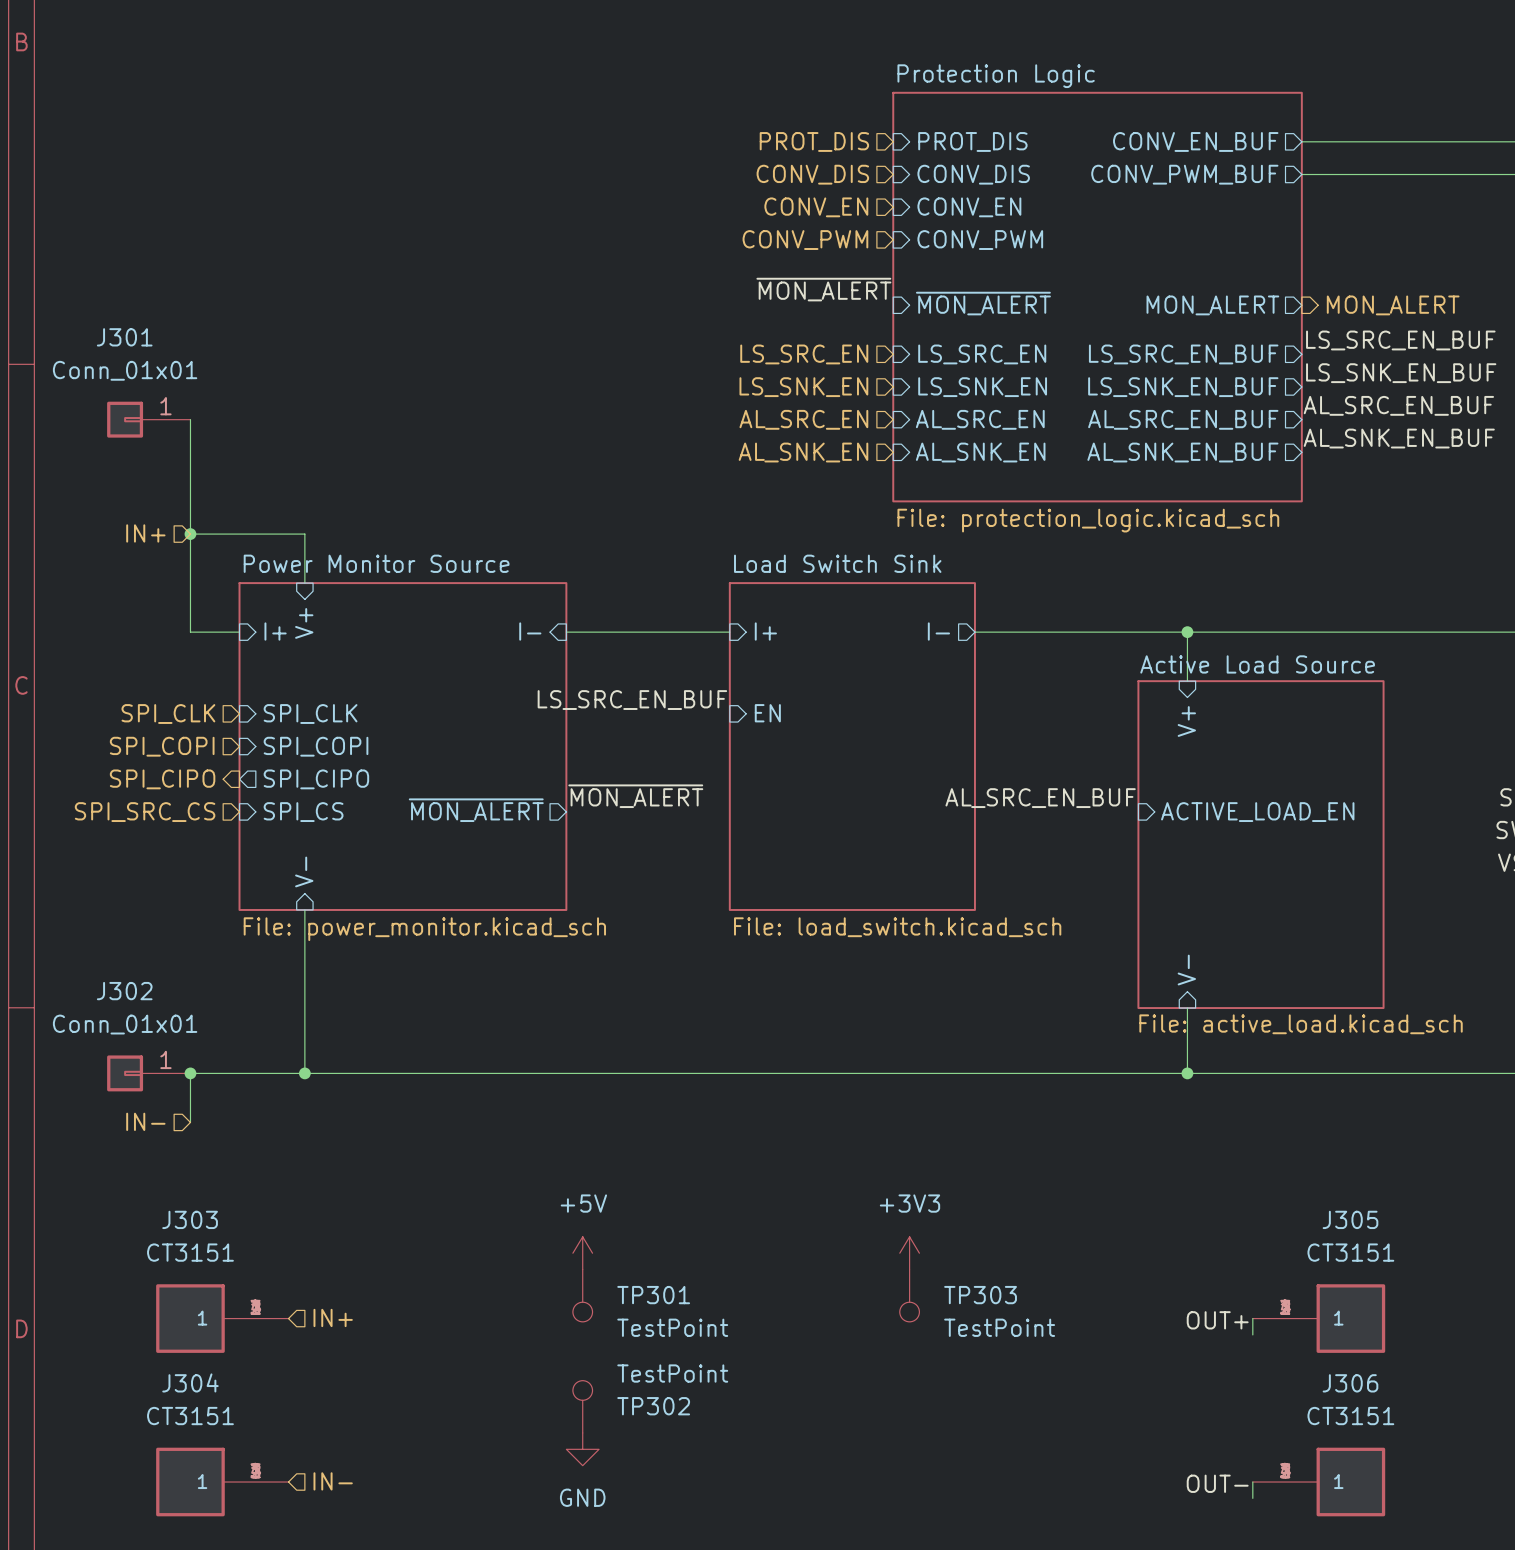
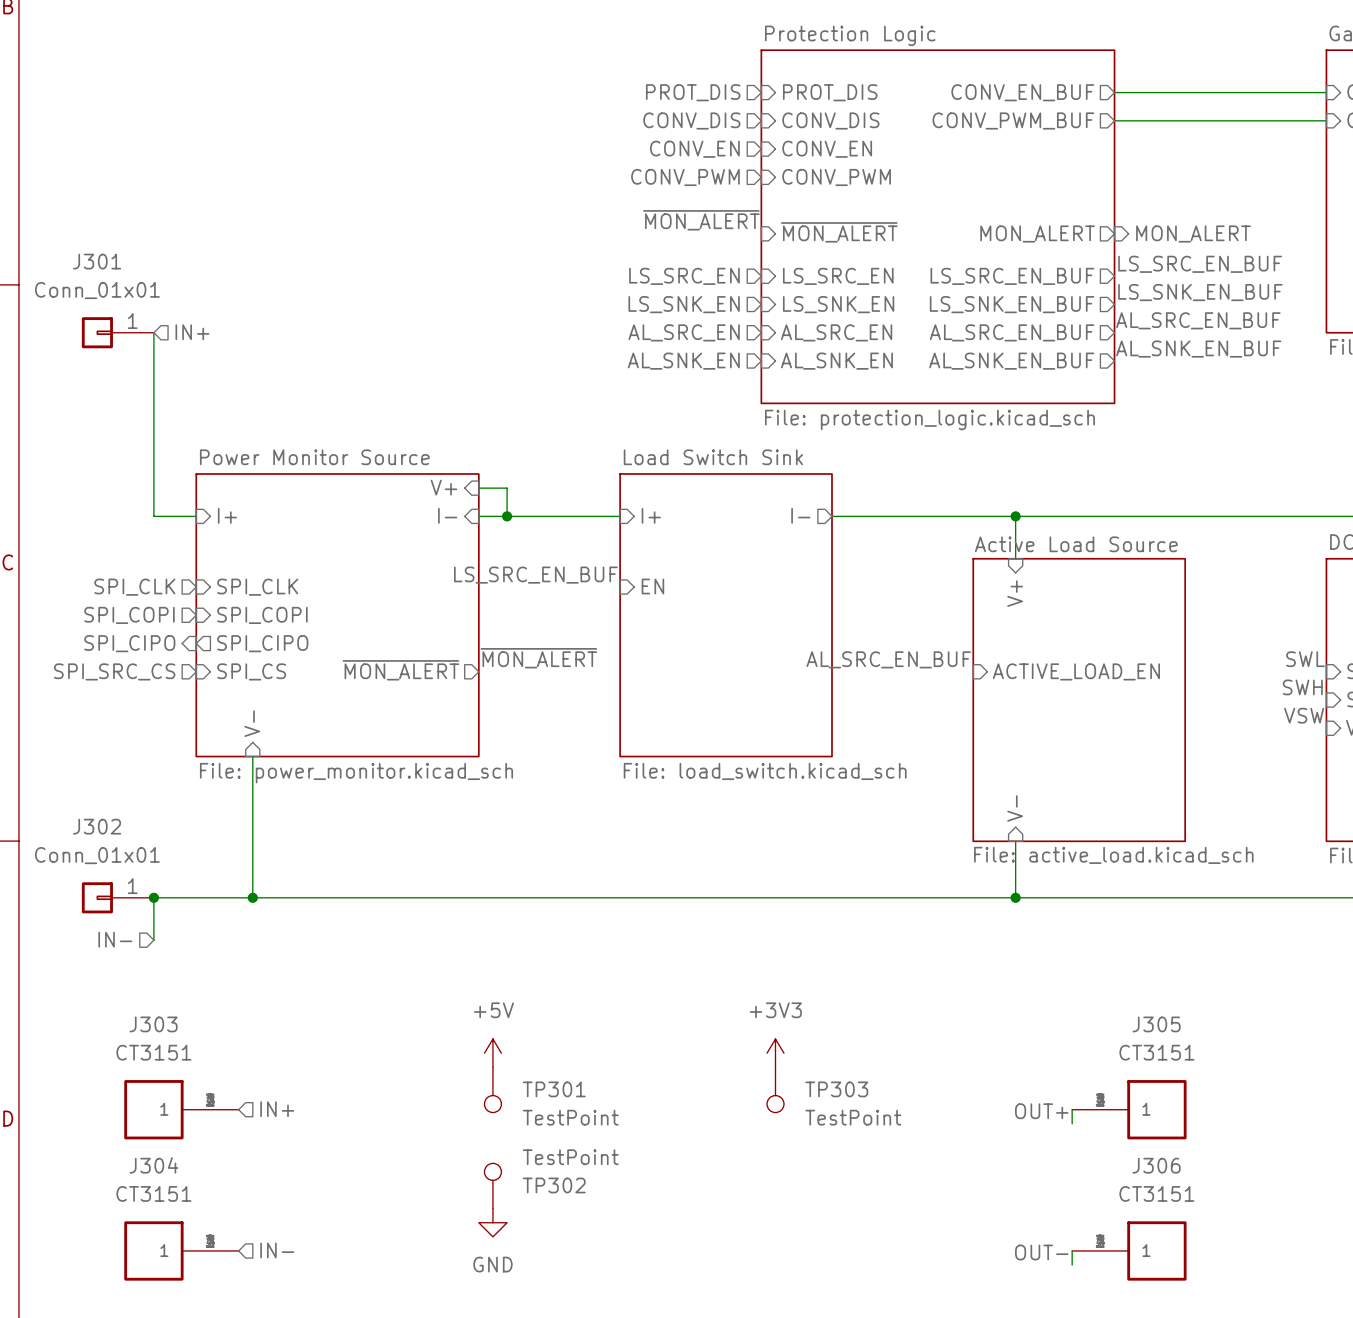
hierarchical label rotation: 0° (145, 533) -> 180° (192, 332)
hierarchical label position: IN+ (145, 533) -> IN+ (192, 332)
wire: (190, 534) (304, 534) (304, 583) -> none
junction: (190, 534) -> none
wire: none -> (478, 488) (507, 488) (507, 516)
sheet pin rotation: 0° (304, 623) -> 90° clockwise (443, 487)
sheet pin position: V+ (304, 623) -> V+ (443, 487)
junction: none -> (507, 516)

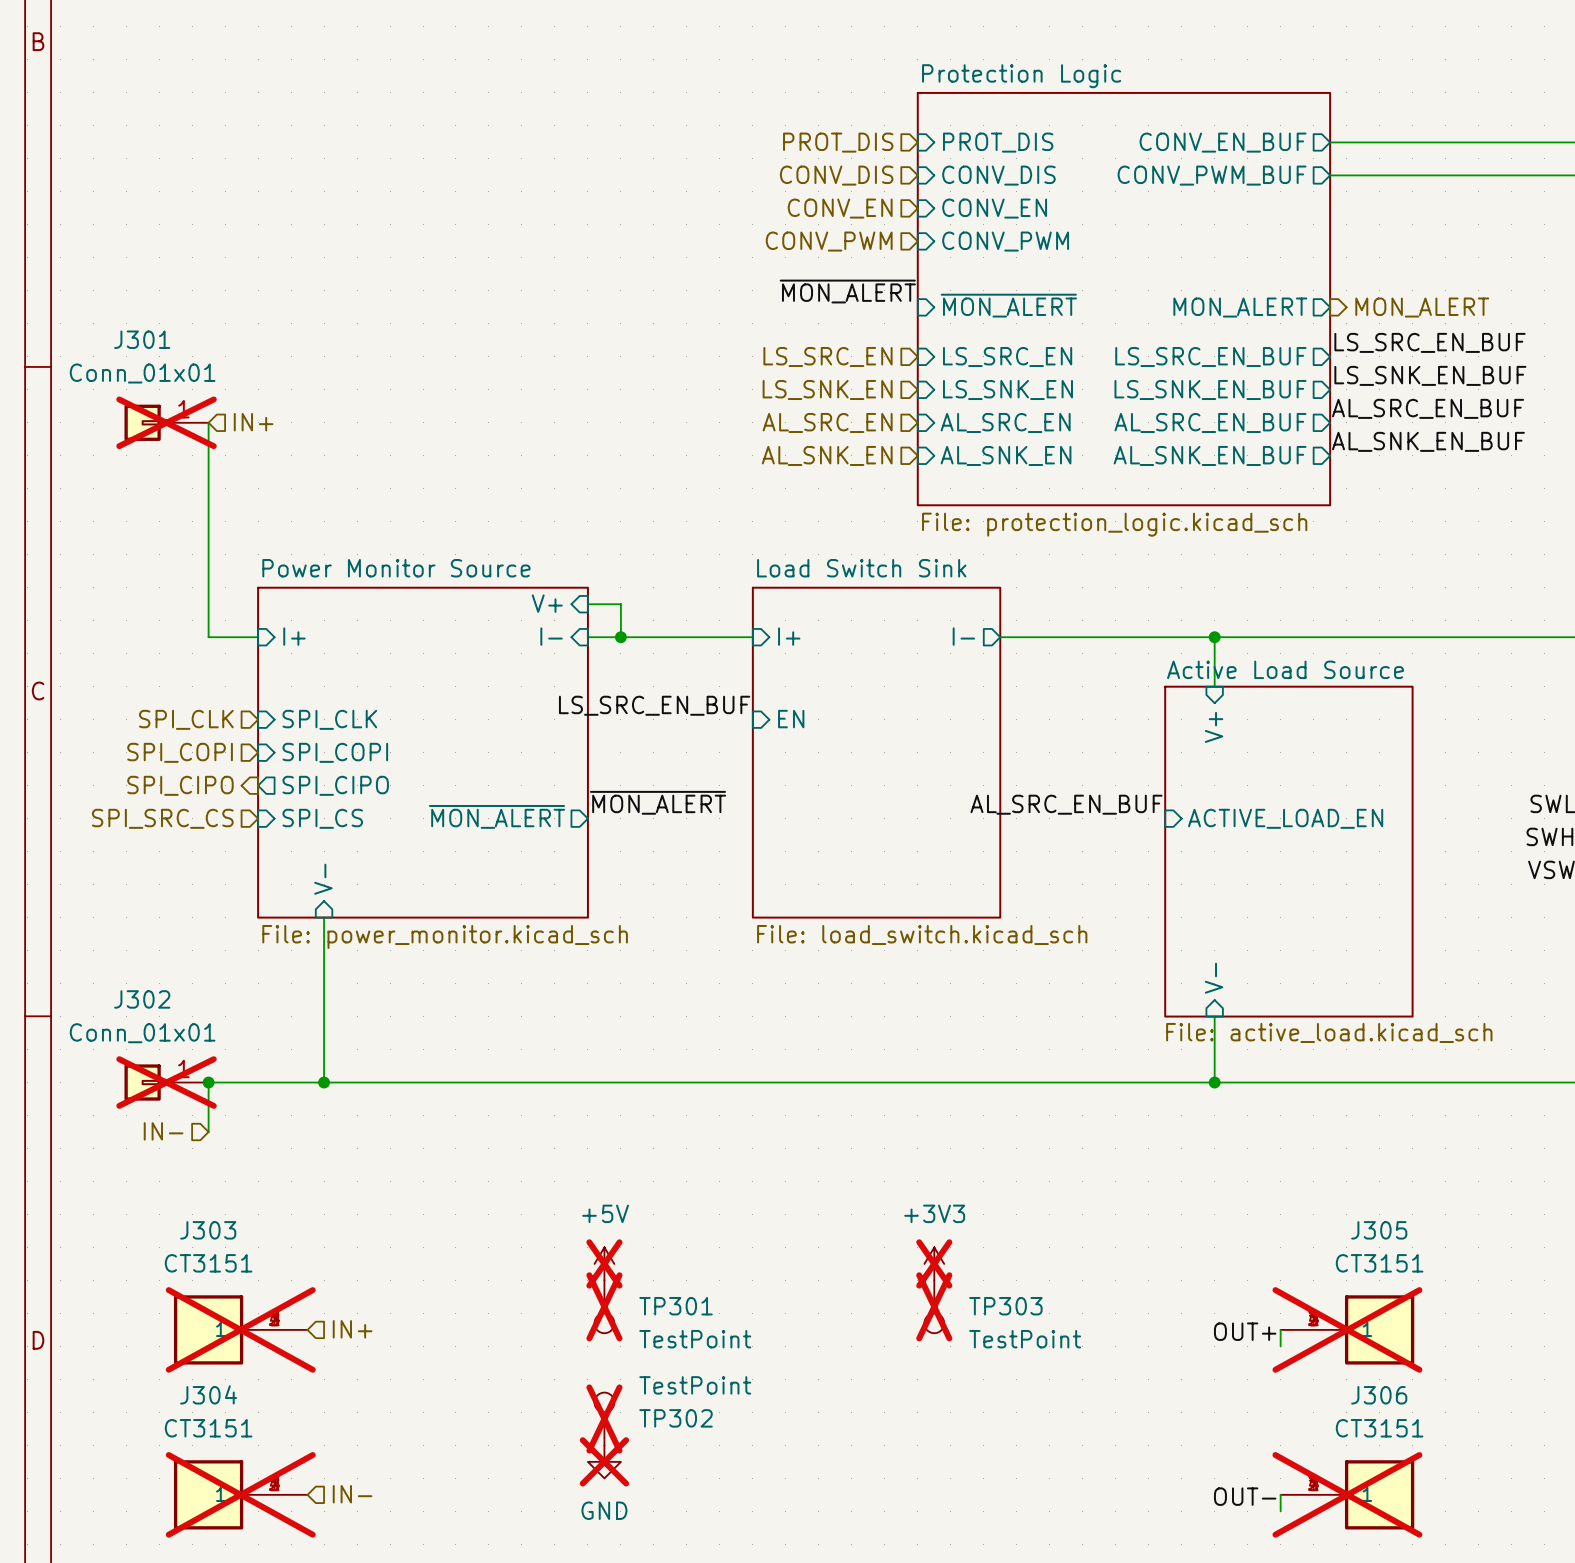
J301 do-not-place cross: none -> (166, 422)
J302 do-not-place cross: none -> (166, 1082)
power symbol do-not-place cross: none -> (604, 1263)
power symbol do-not-place cross: none -> (934, 1263)
TP301 do-not-place cross: none -> (604, 1306)
TP303 do-not-place cross: none -> (934, 1306)
J303 do-not-place cross: none -> (240, 1329)
J305 do-not-place cross: none -> (1347, 1329)
TP302 do-not-place cross: none -> (604, 1418)
power symbol do-not-place cross: none -> (604, 1461)
J304 do-not-place cross: none -> (240, 1494)
J306 do-not-place cross: none -> (1347, 1494)

